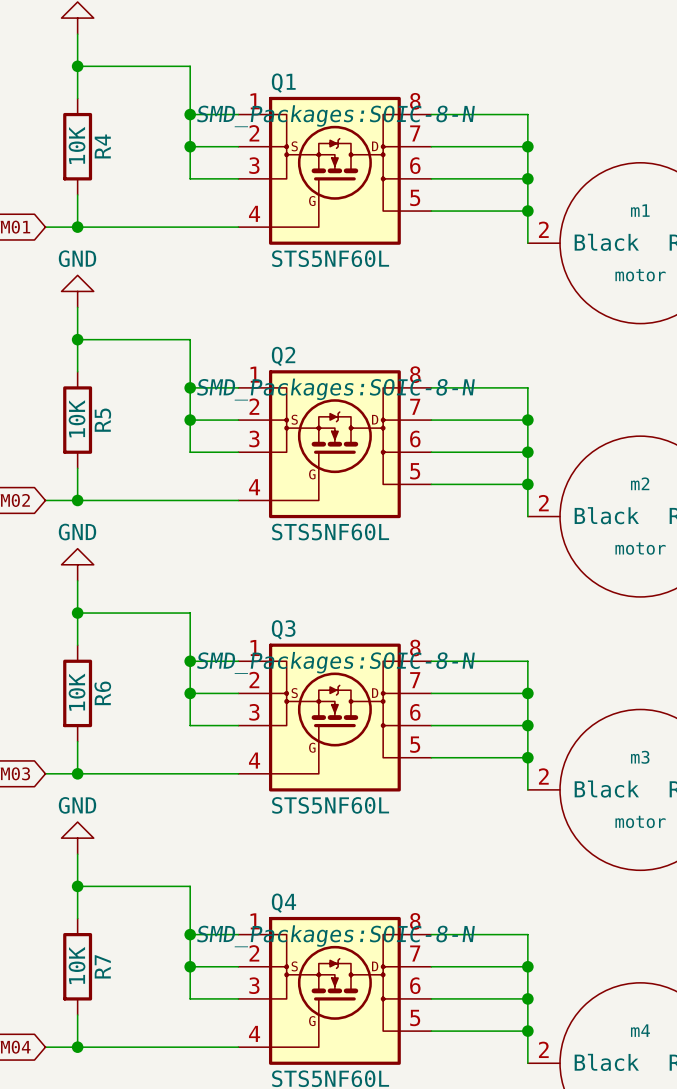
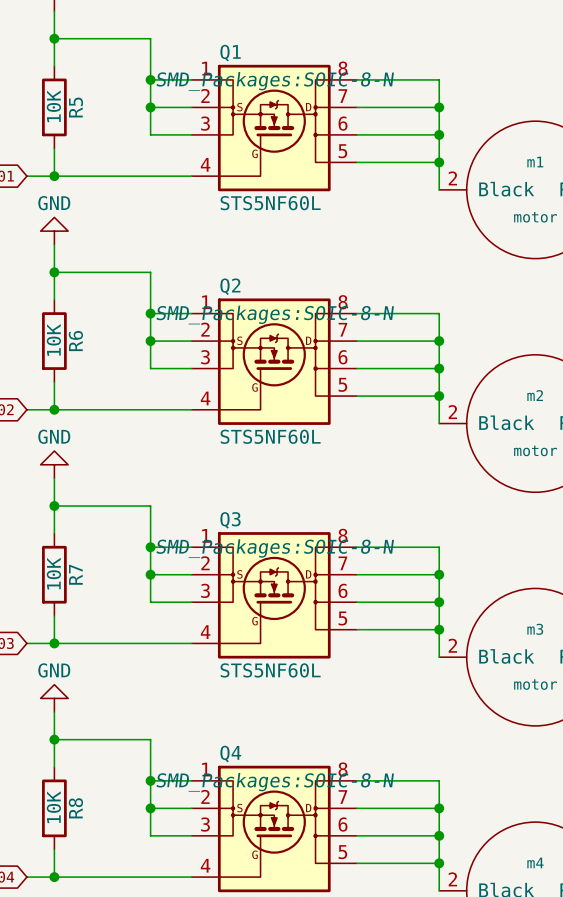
R4 name: R4 (102, 146) -> R5 (76, 107)
R5 name: R5 (102, 420) -> R6 (75, 341)
R6 name: R6 (102, 693) -> R7 (75, 574)
R7 name: R7 (102, 966) -> R8 (75, 808)

